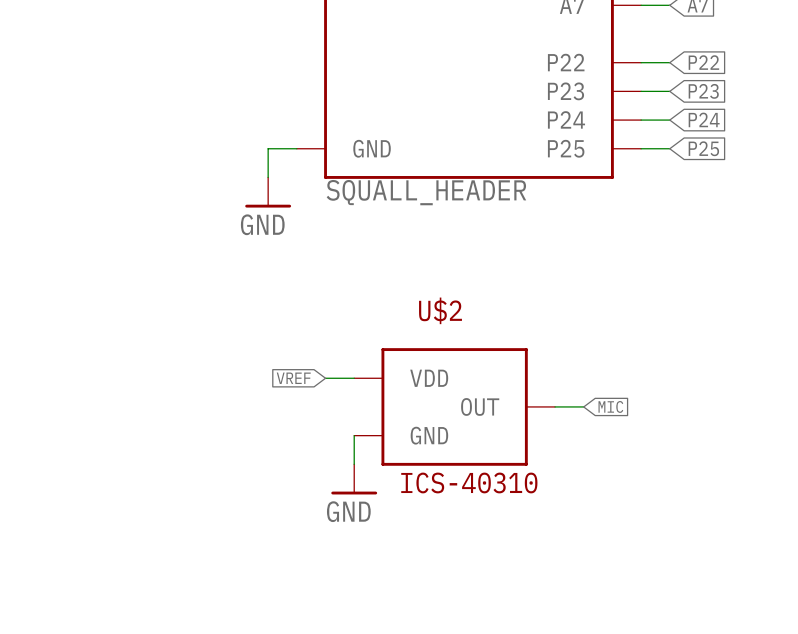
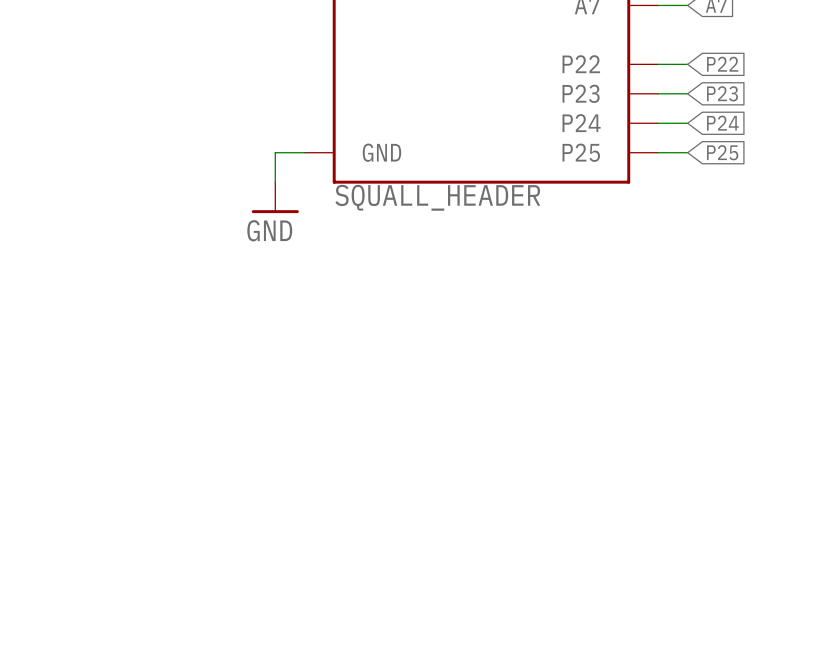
global label: VREF (293, 378) -> none
wire: (325, 378) (354, 378) -> none
U$2: (454, 406) -> none
wire: (555, 406) (583, 406) -> none
global label: MIC (610, 406) -> none
wire: (354, 435) (354, 464) -> none
power symbol: GND (354, 479) -> none

